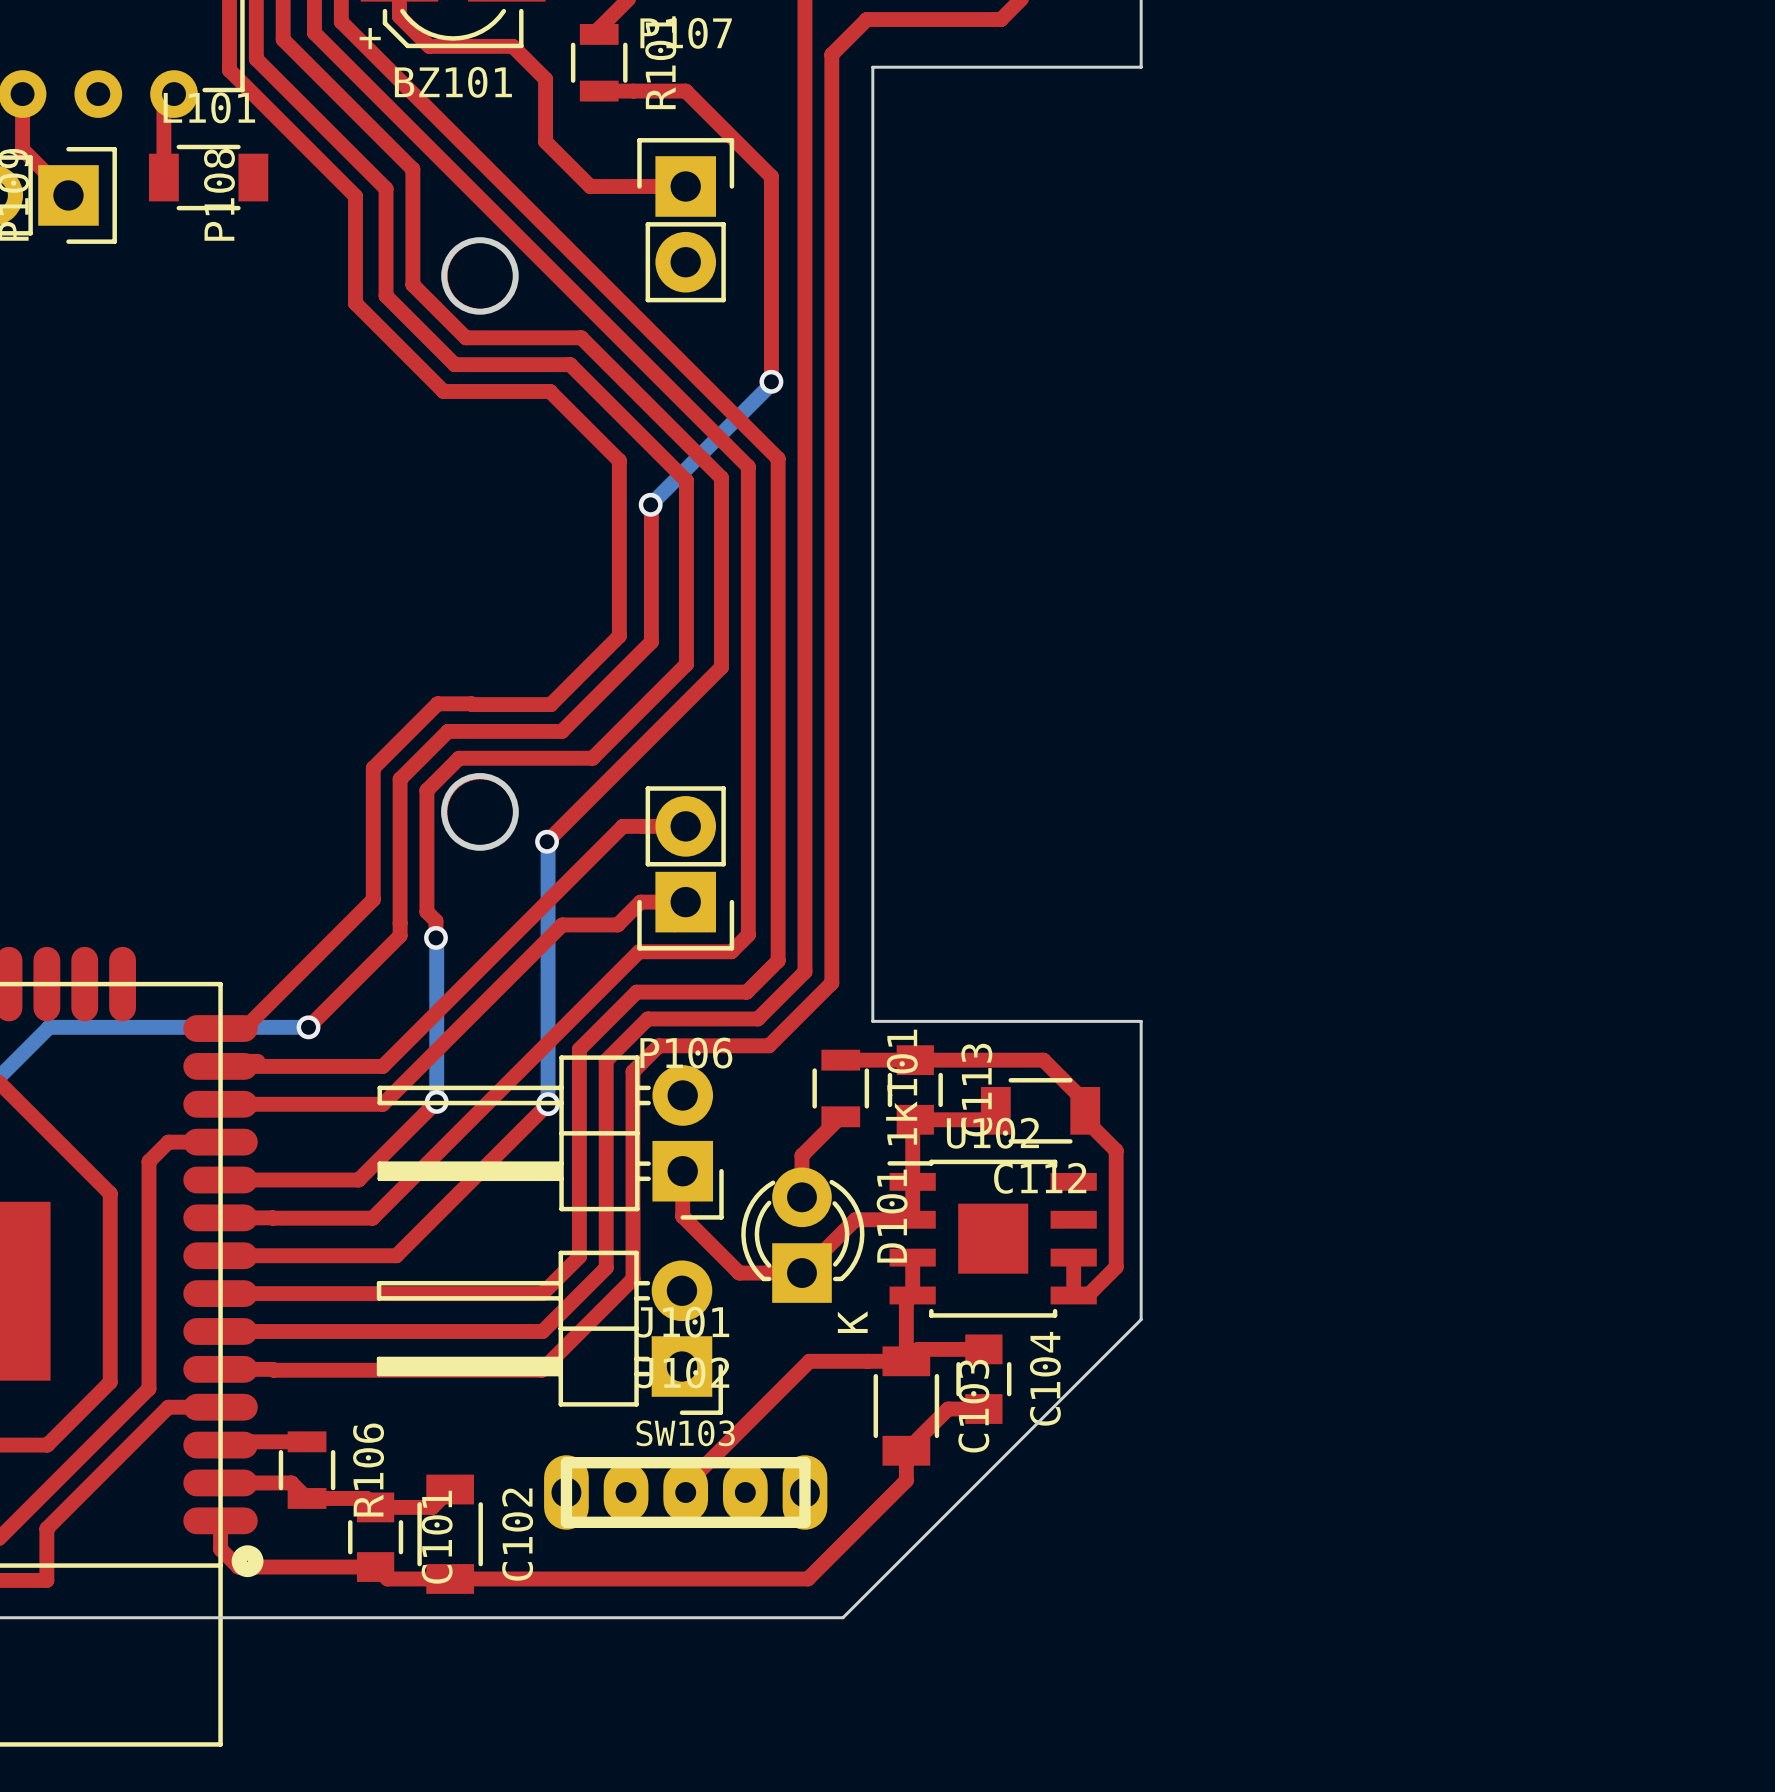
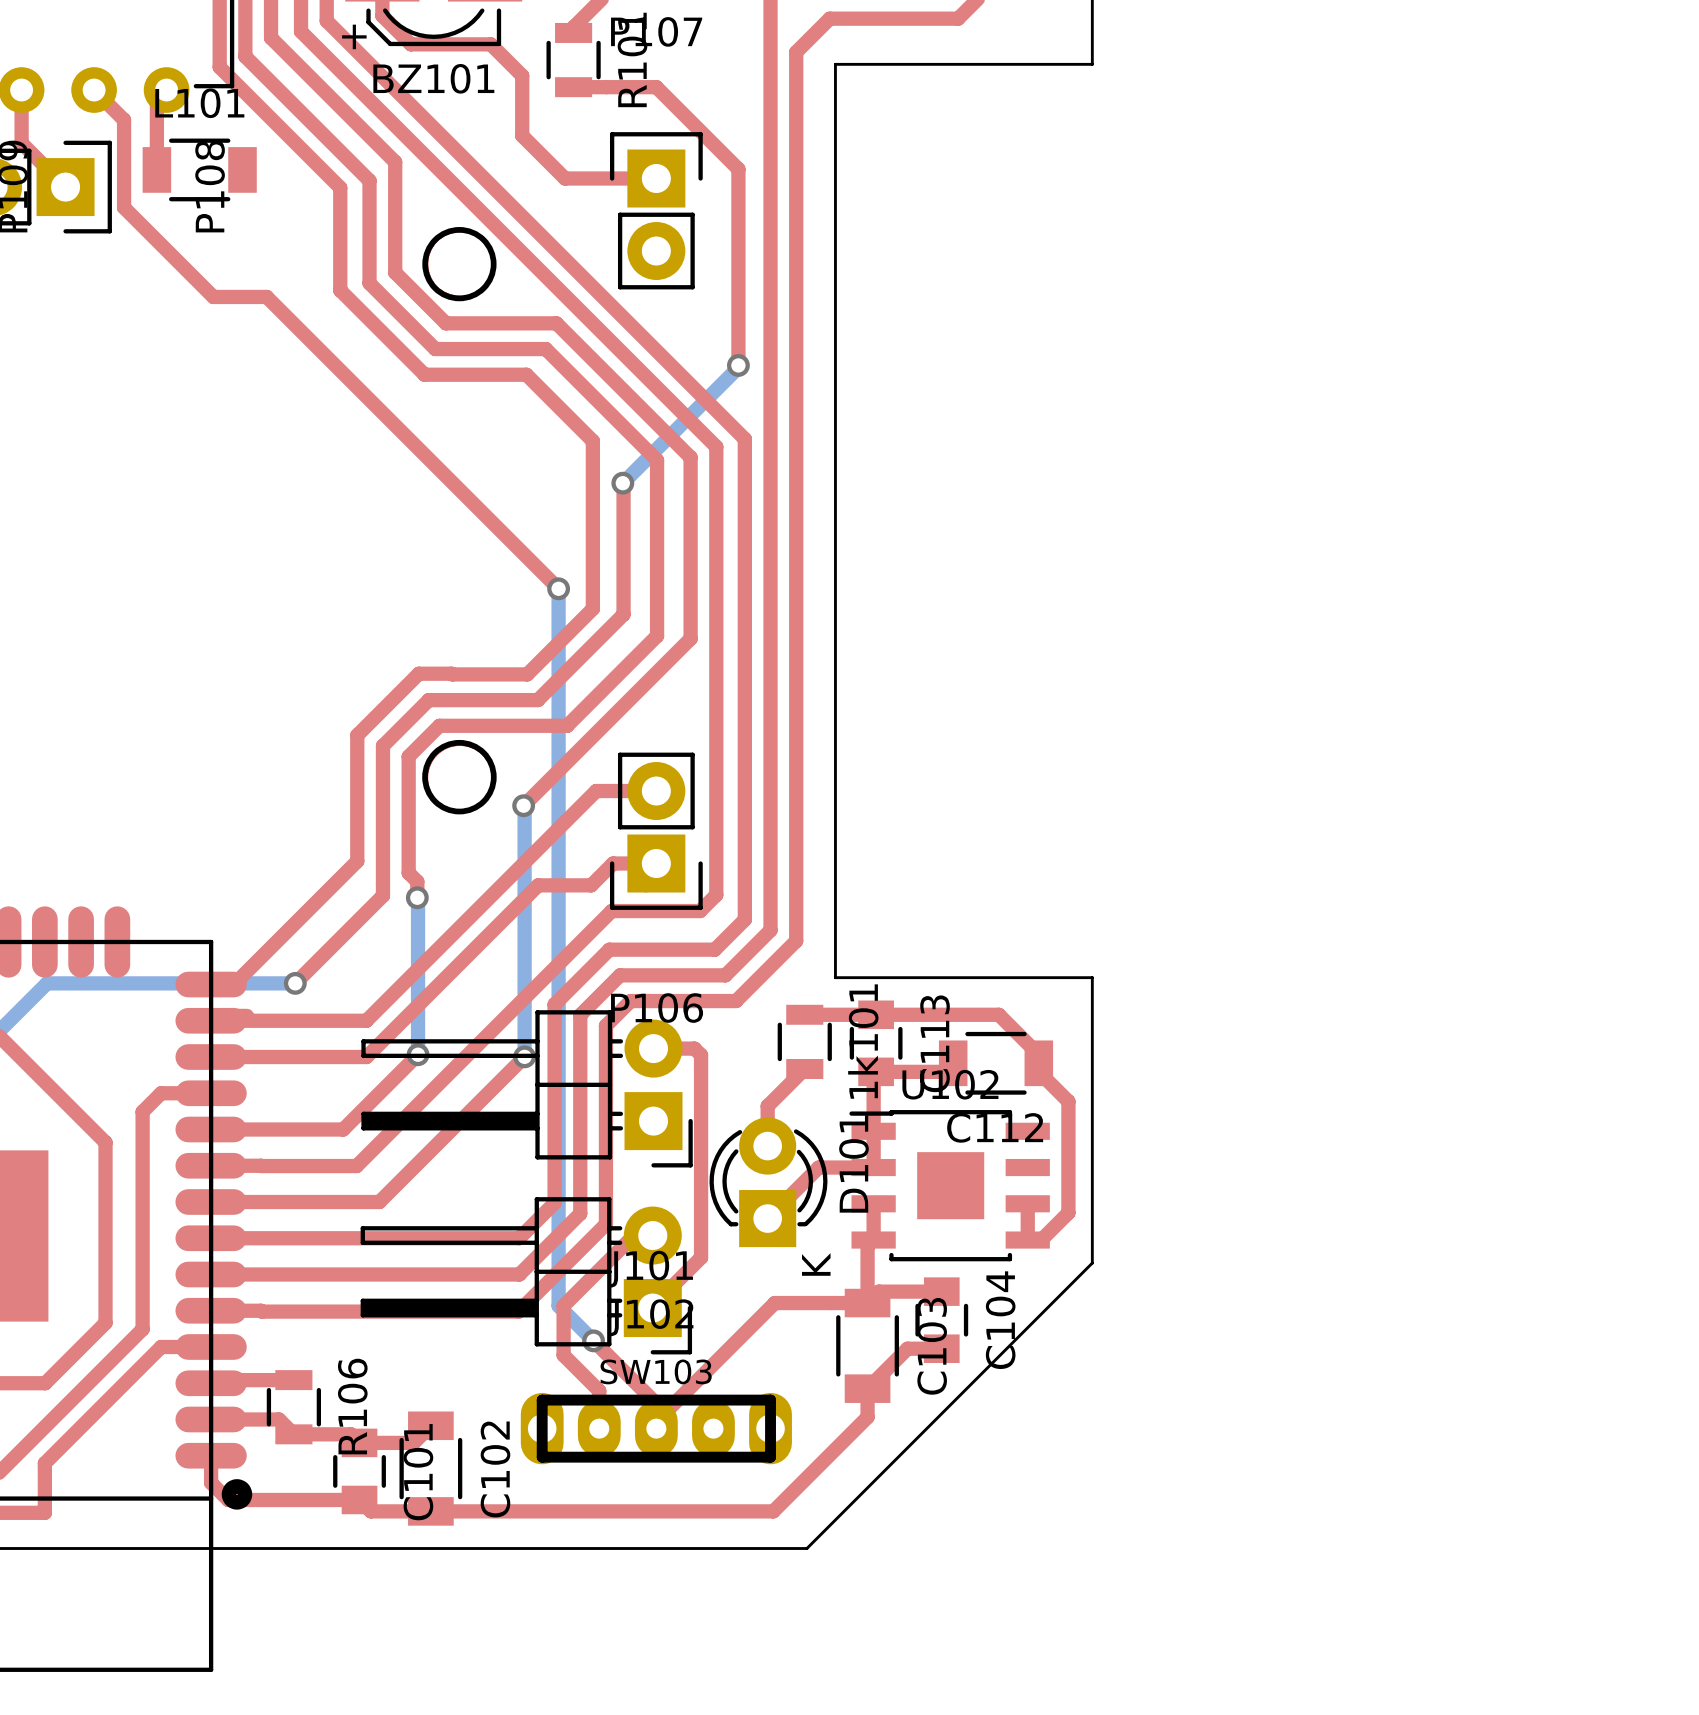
top track: none -> (94, 90) (124, 120) (124, 207) (213, 296) (266, 296) (558, 588)
bottom track: none -> (558, 588) (558, 1305) (593, 1340)
via: none -> (558, 588)
top track: none -> (653, 1048) (694, 1048) (701, 1055) (701, 1257) (652, 1308)
top track: (682, 1171) (682, 1216) (739, 1273) (801, 1273) -> none
top track: none -> (652, 1235) (633, 1235) (563, 1305) (563, 1355) (599, 1390) (599, 1428)
top track: none -> (593, 1340) (656, 1403) (656, 1421)
via: none -> (593, 1340)

